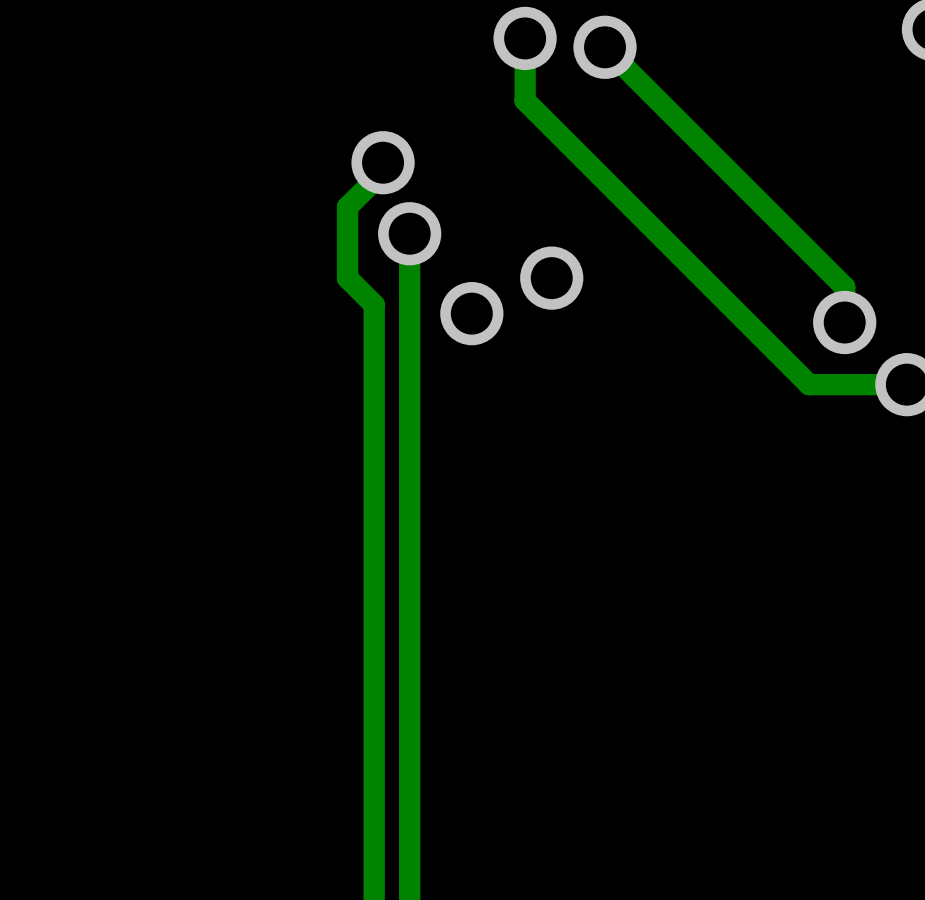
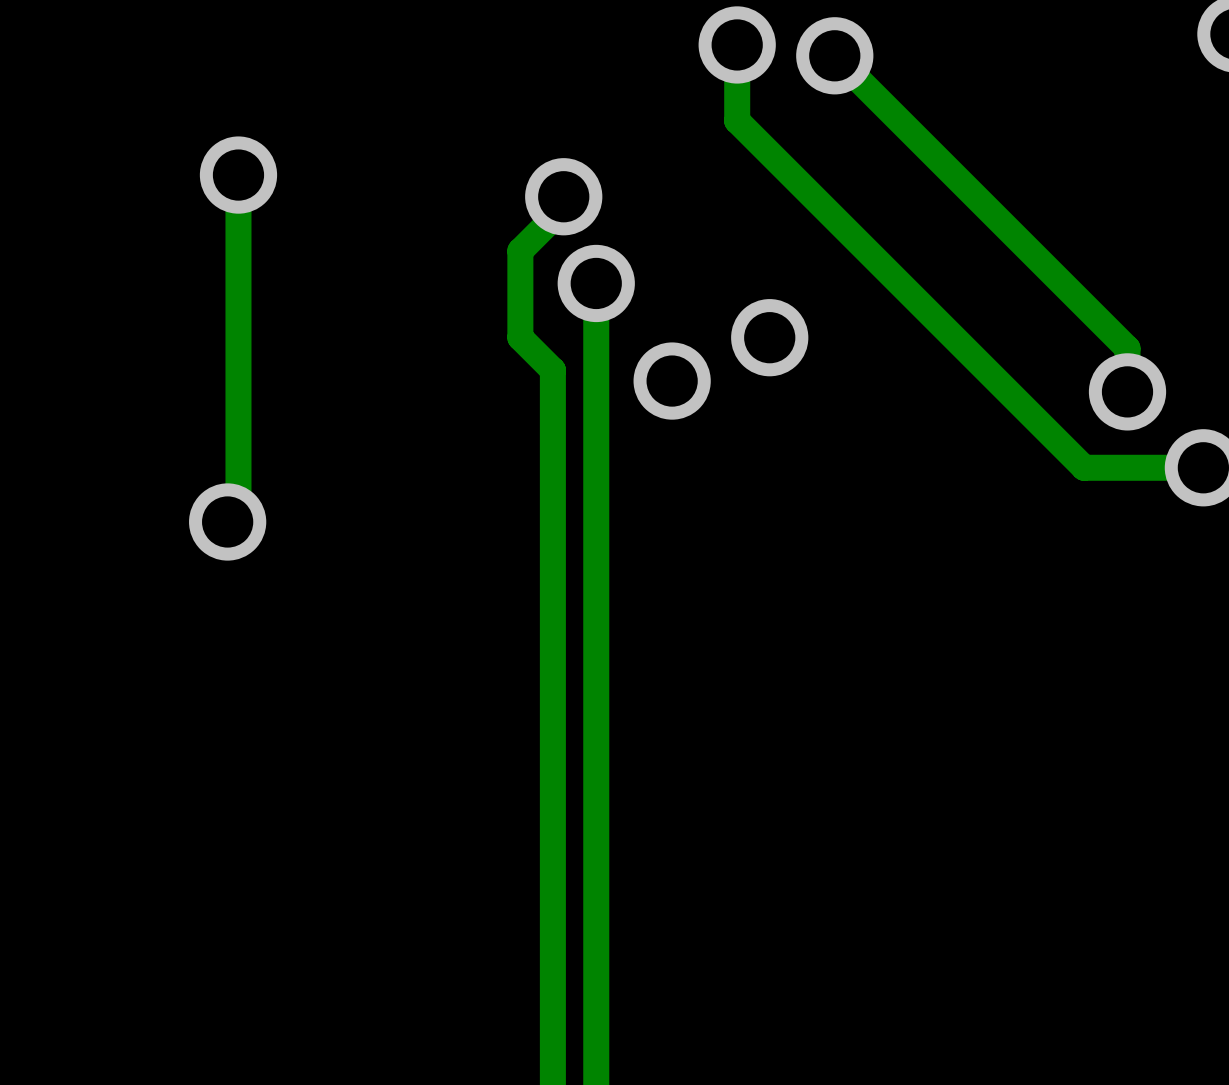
track: none -> (238, 175) (238, 511) (227, 521)
via: none -> (238, 175)
via: none -> (227, 521)

